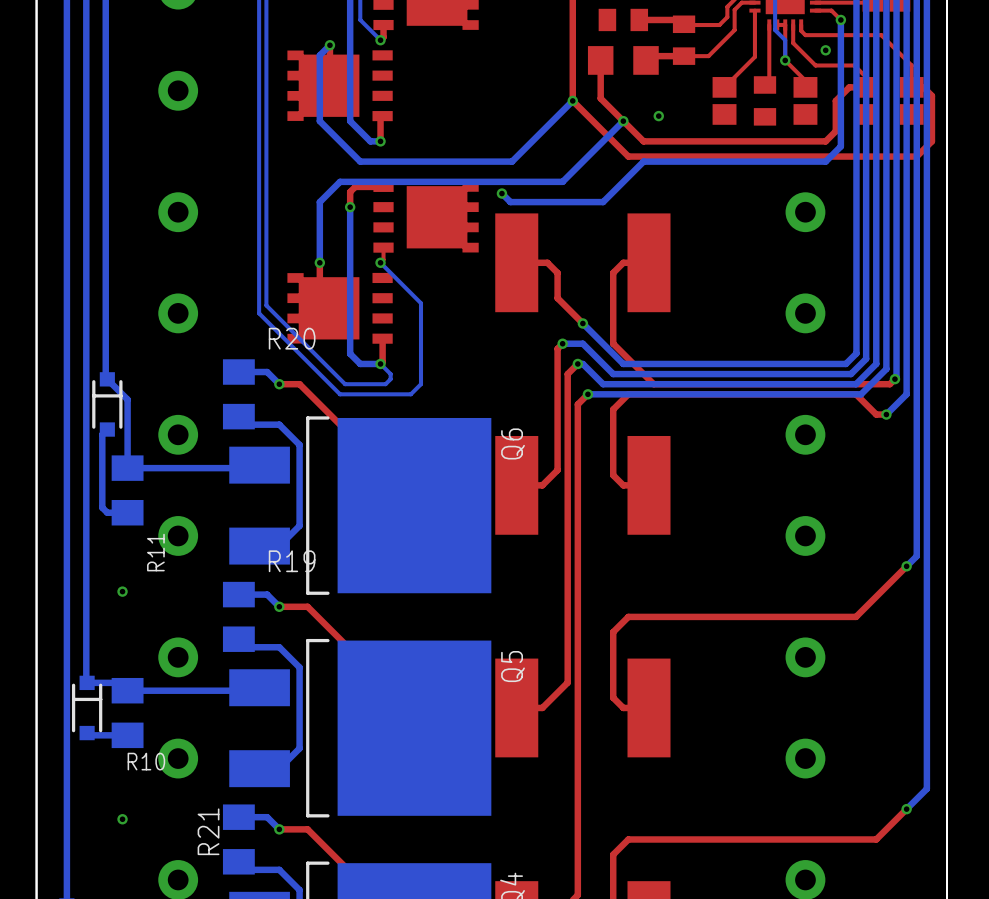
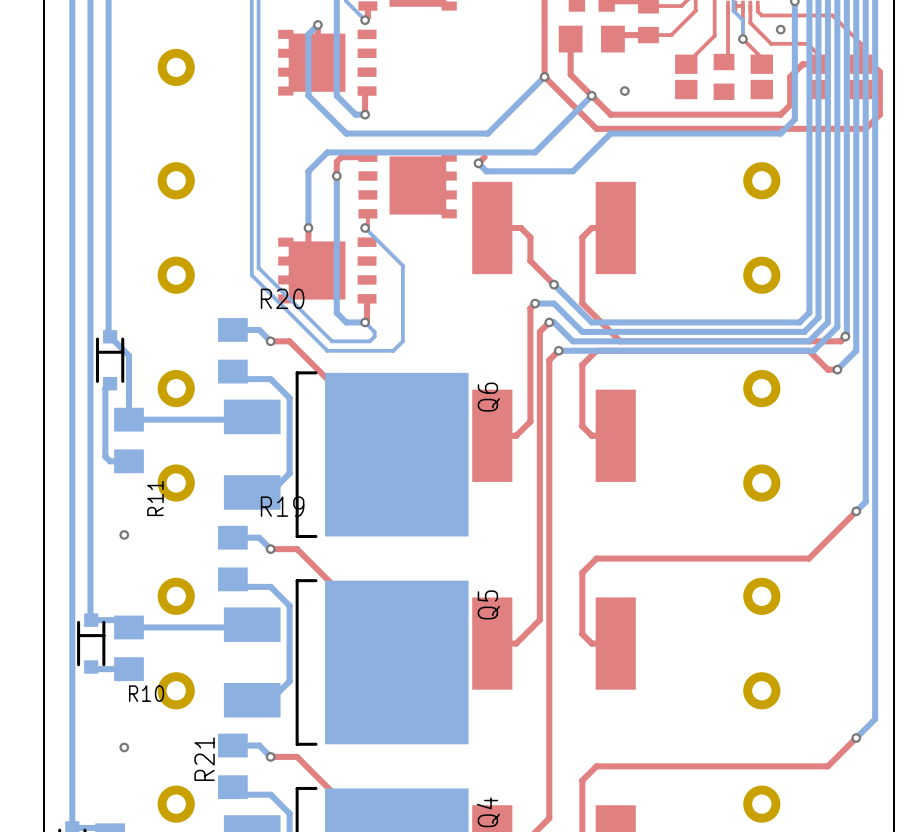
top track: none -> (484, 157) (478, 163)

